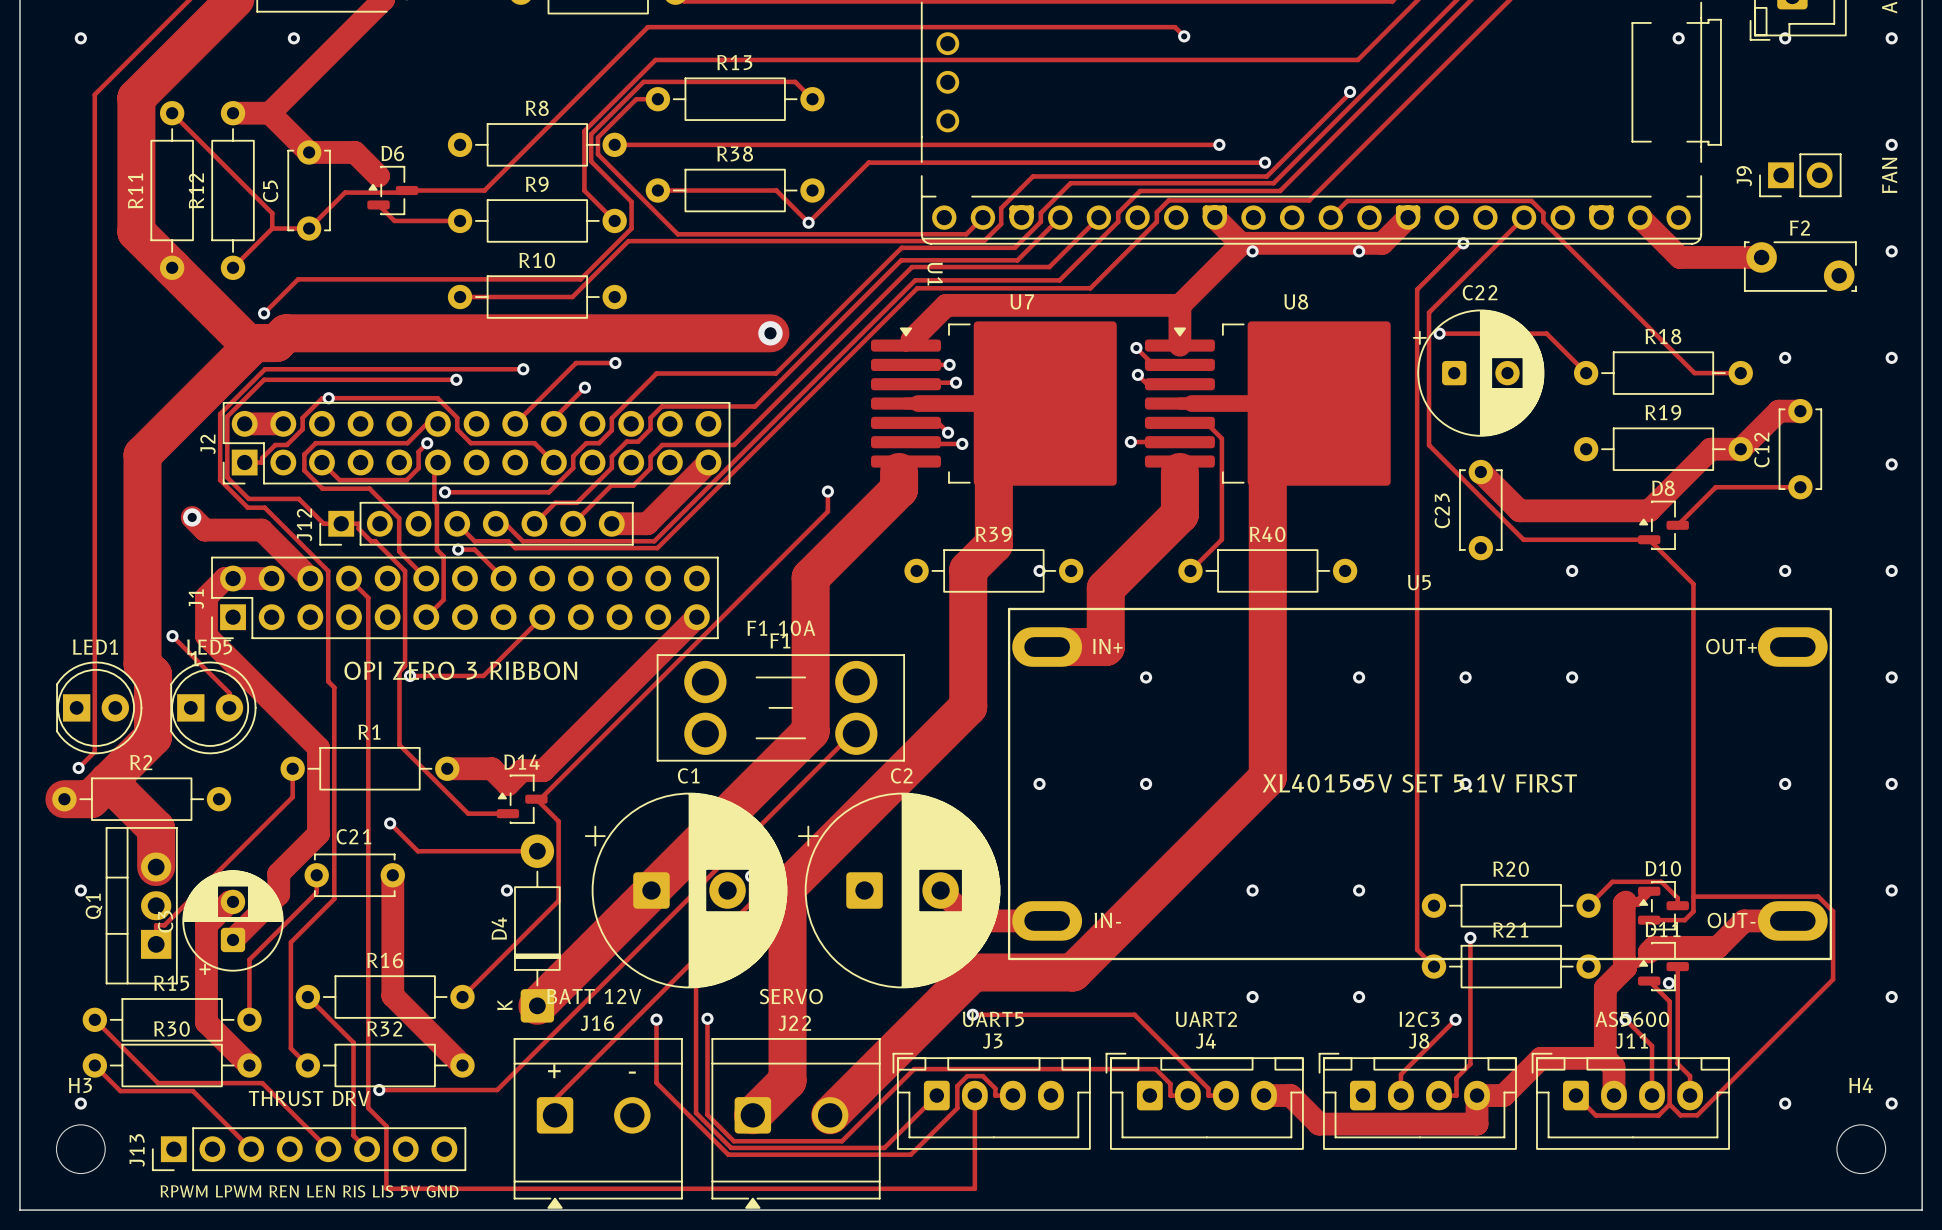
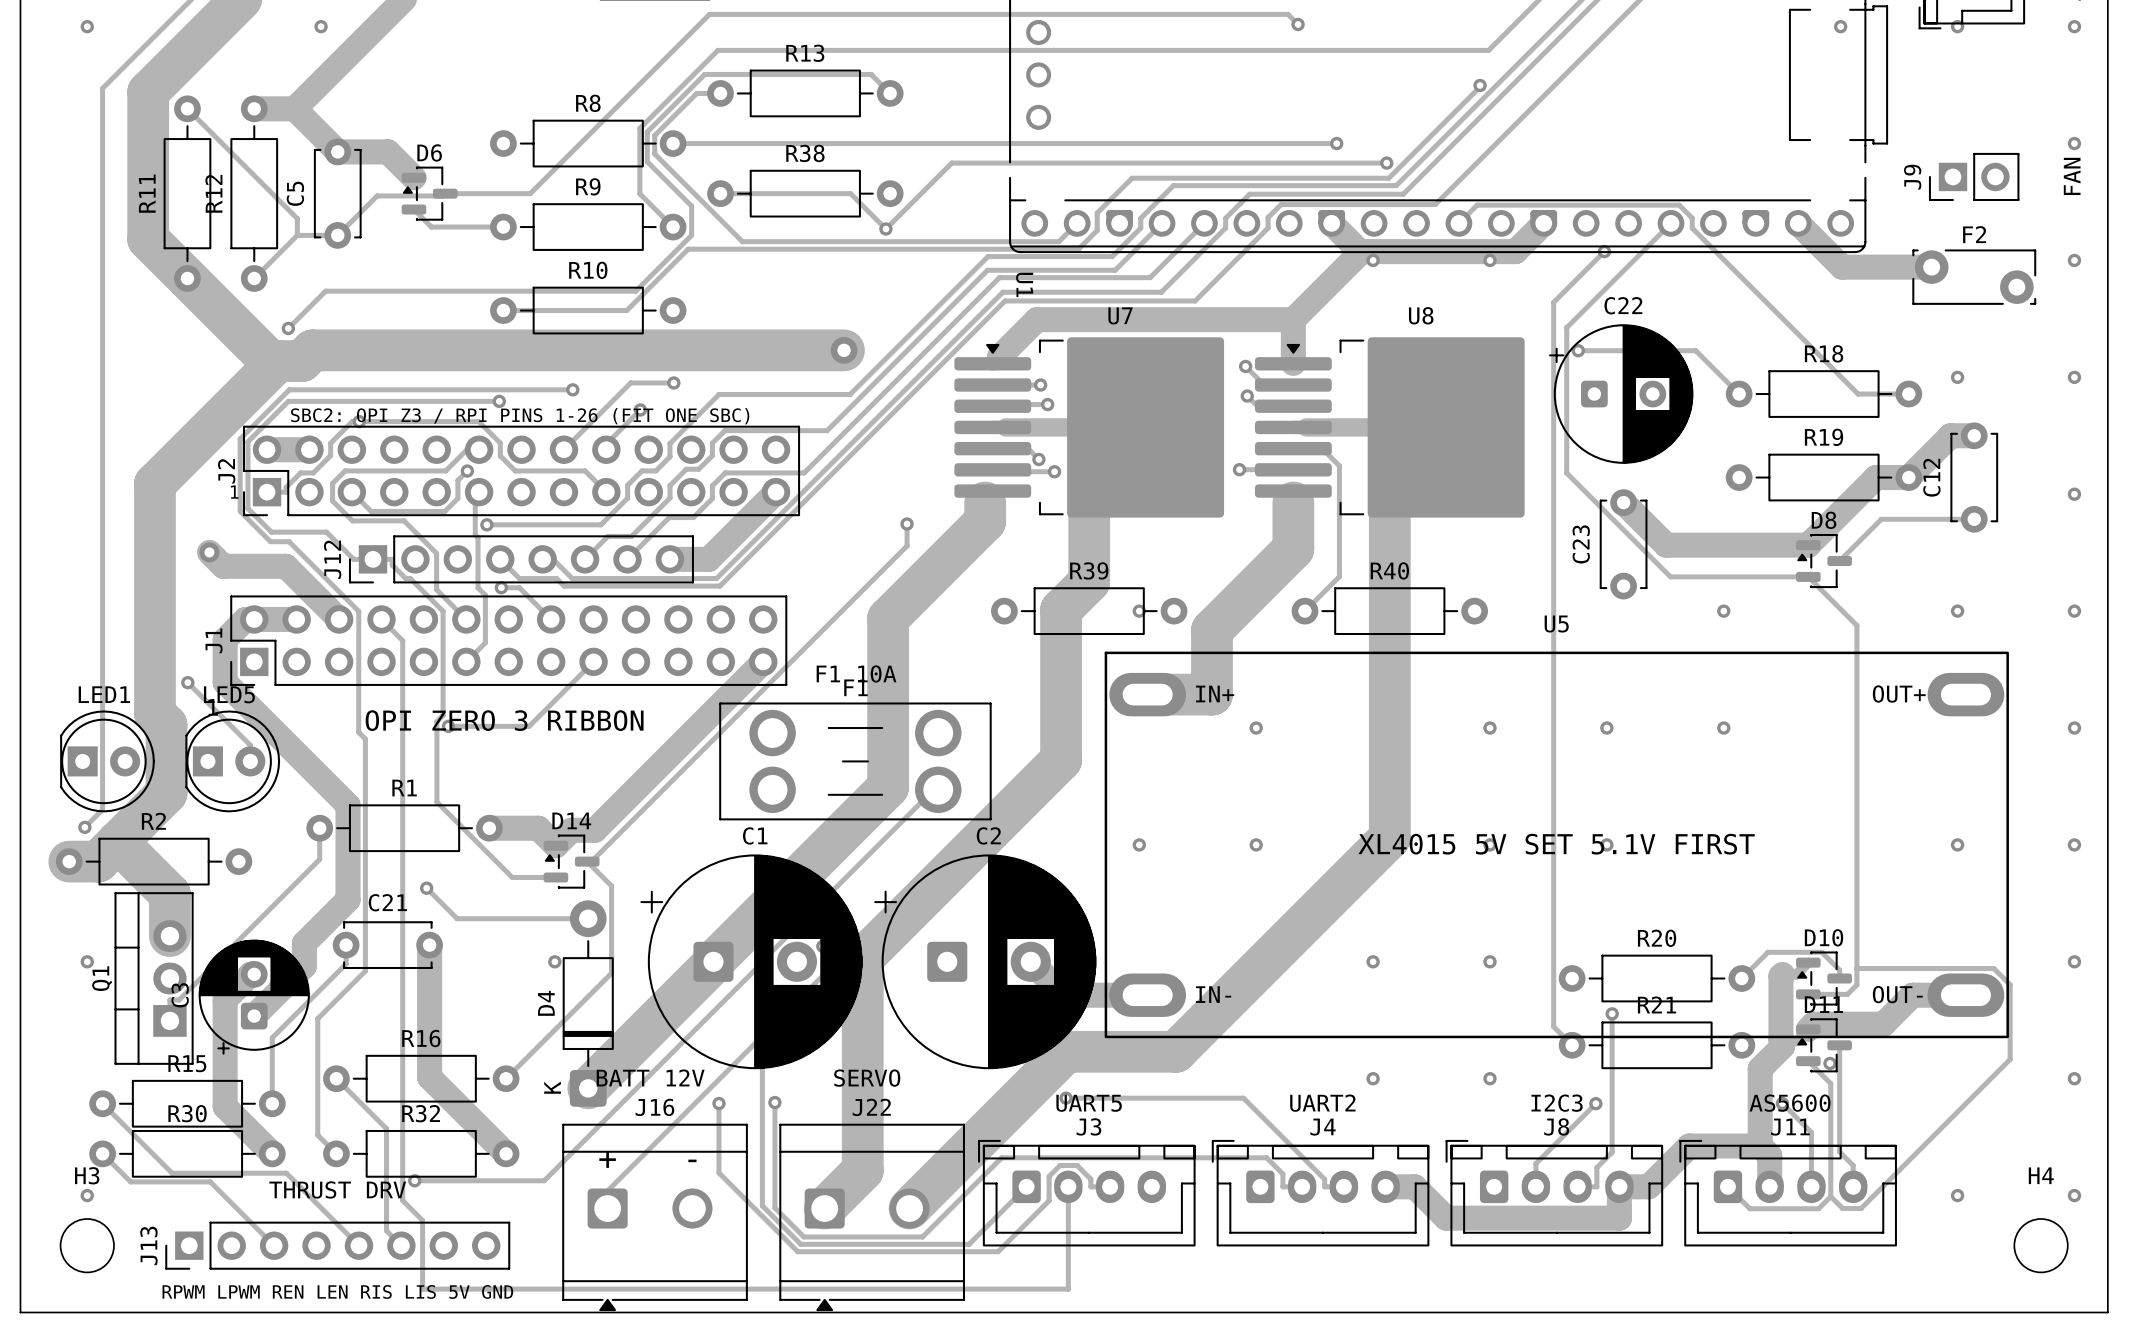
text: none -> SBC2: OPI Z3 / RPI PINS 1-26 (FIT ONE SBC) (520, 416)
text: none -> 1 (234, 492)

